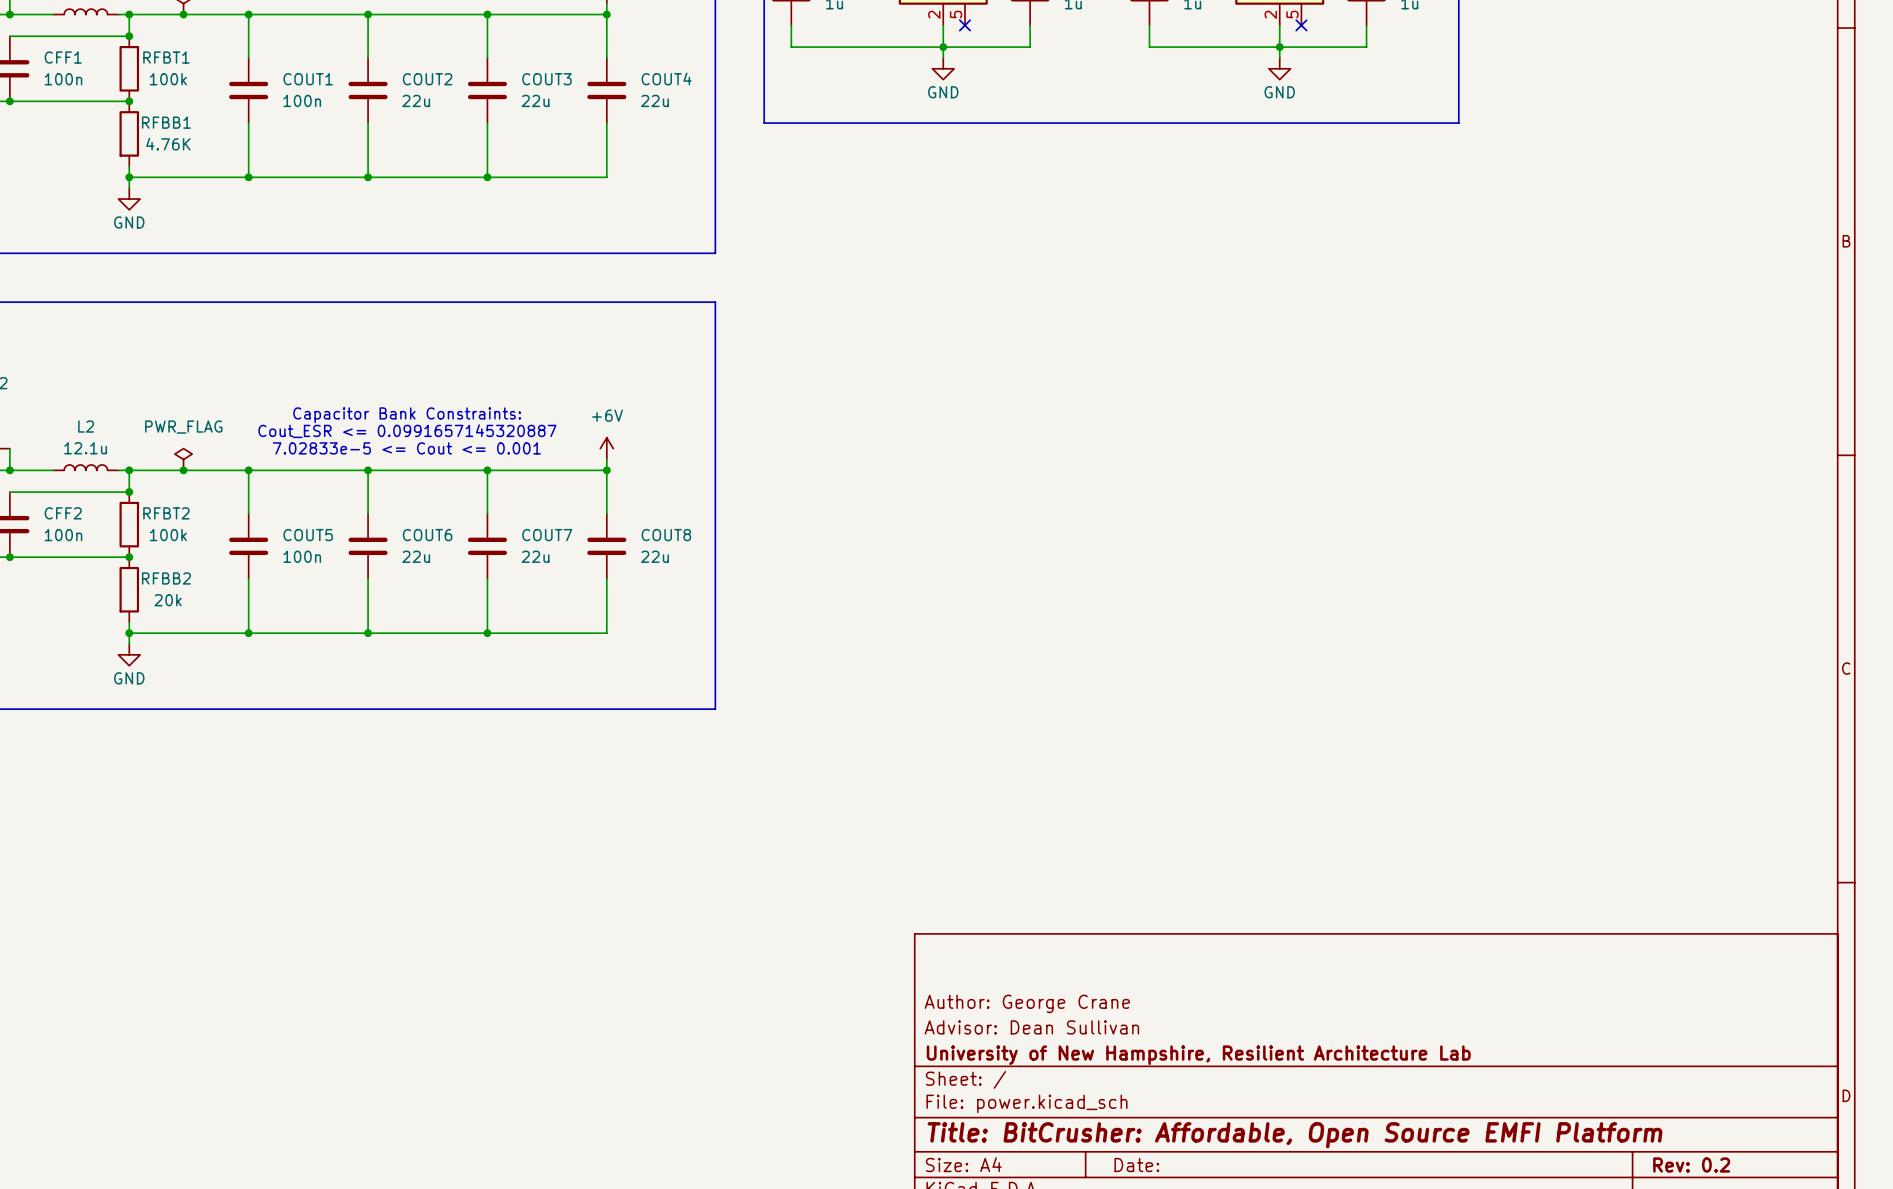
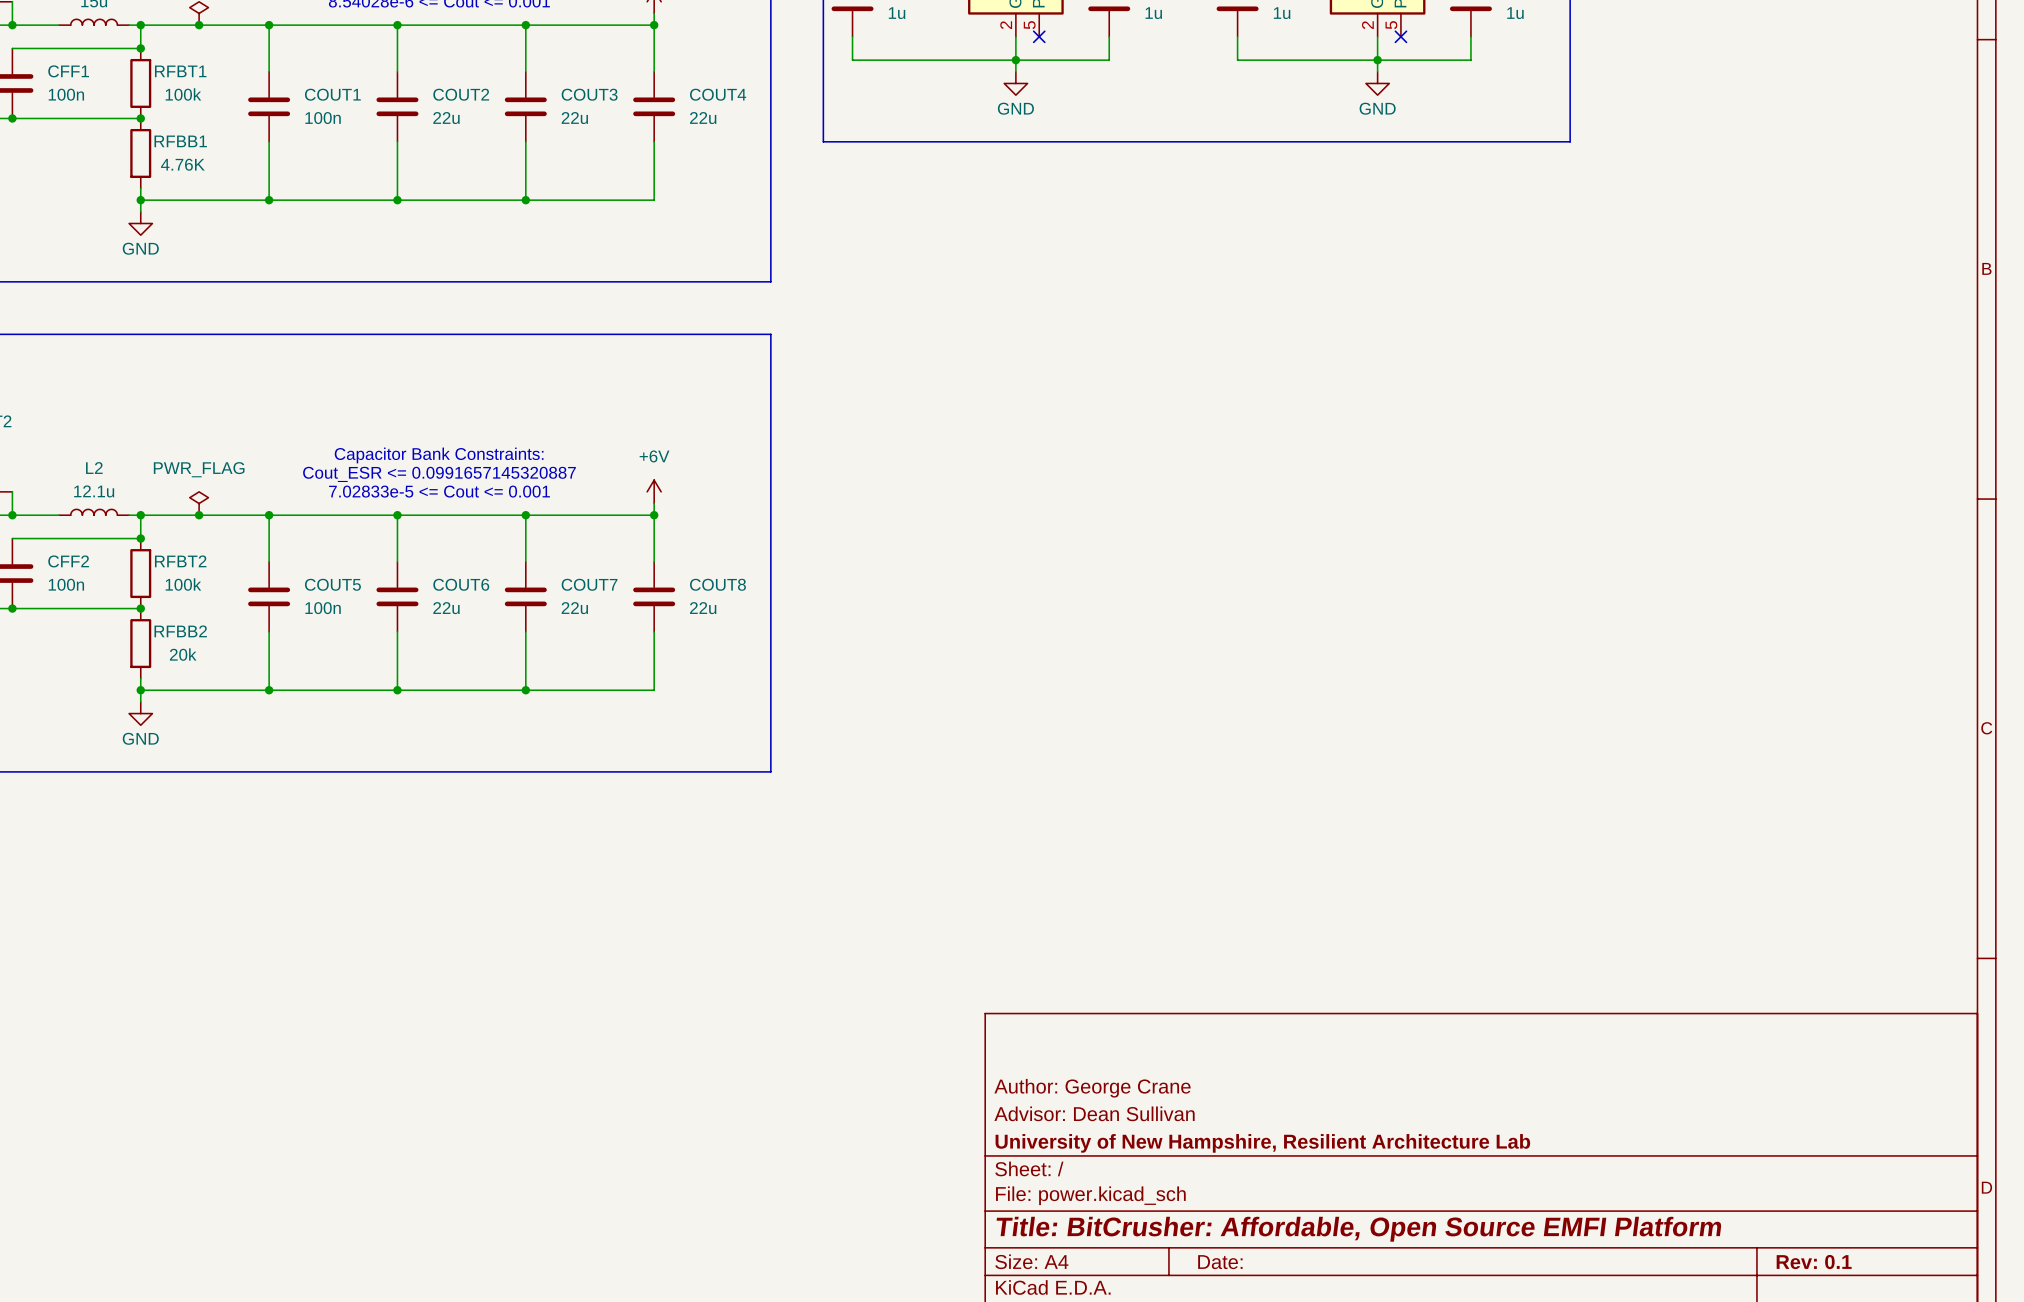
title block: Rev: 0.2 (1691, 1165) -> Rev: 0.1 (1814, 1262)

